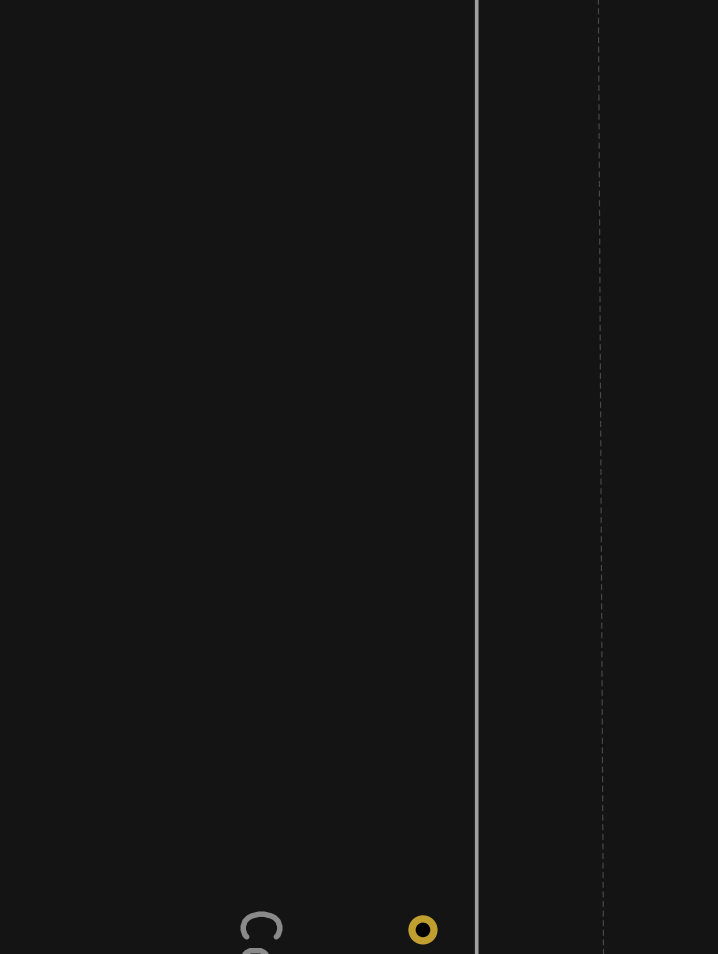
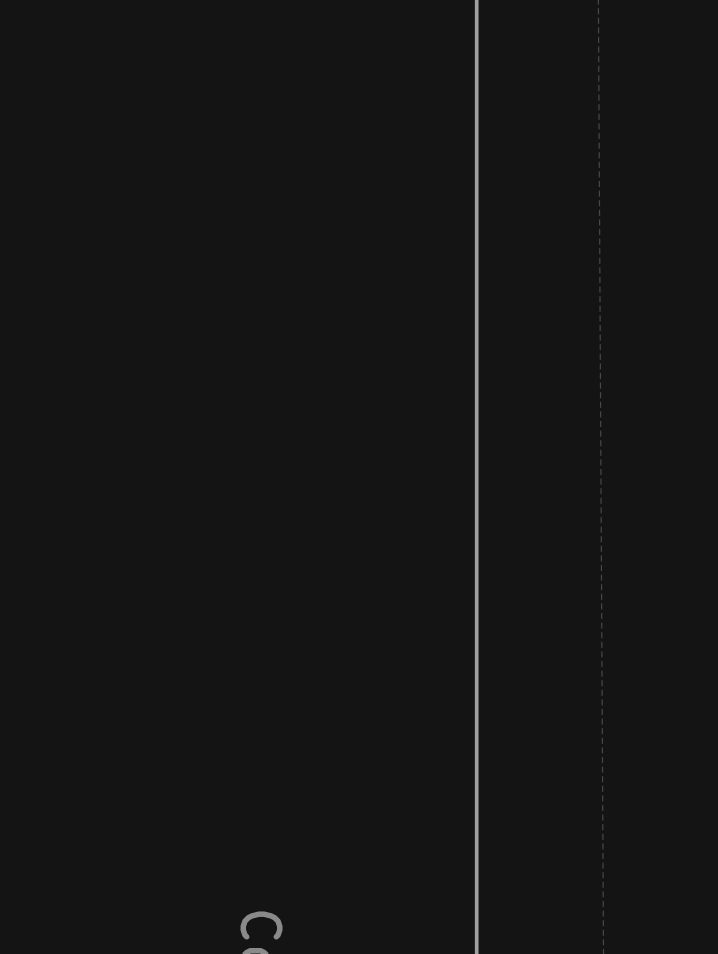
via: (422, 929) -> none

